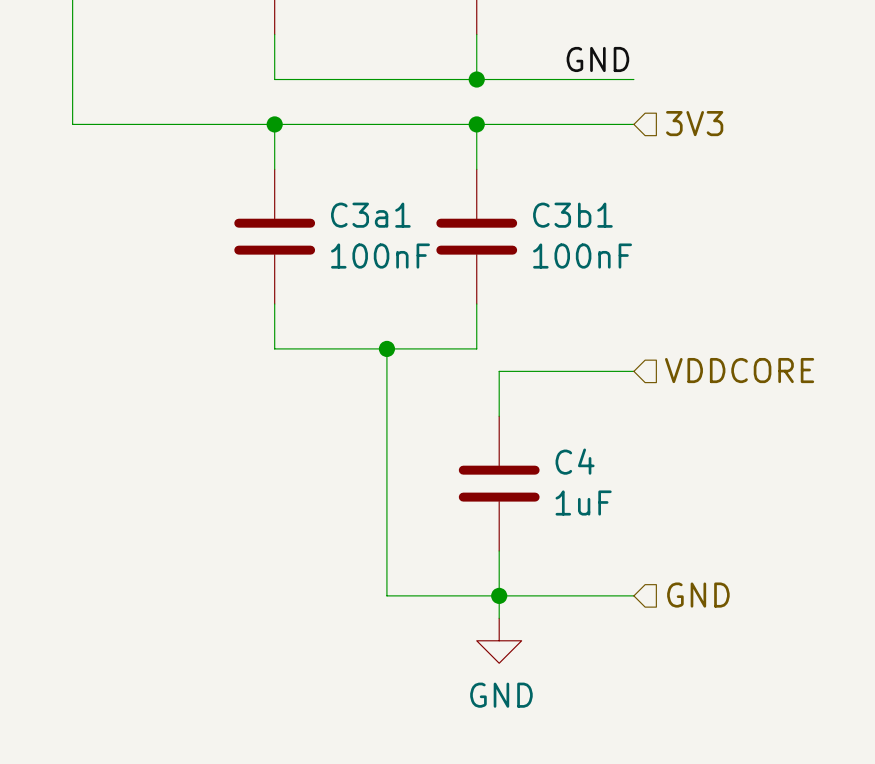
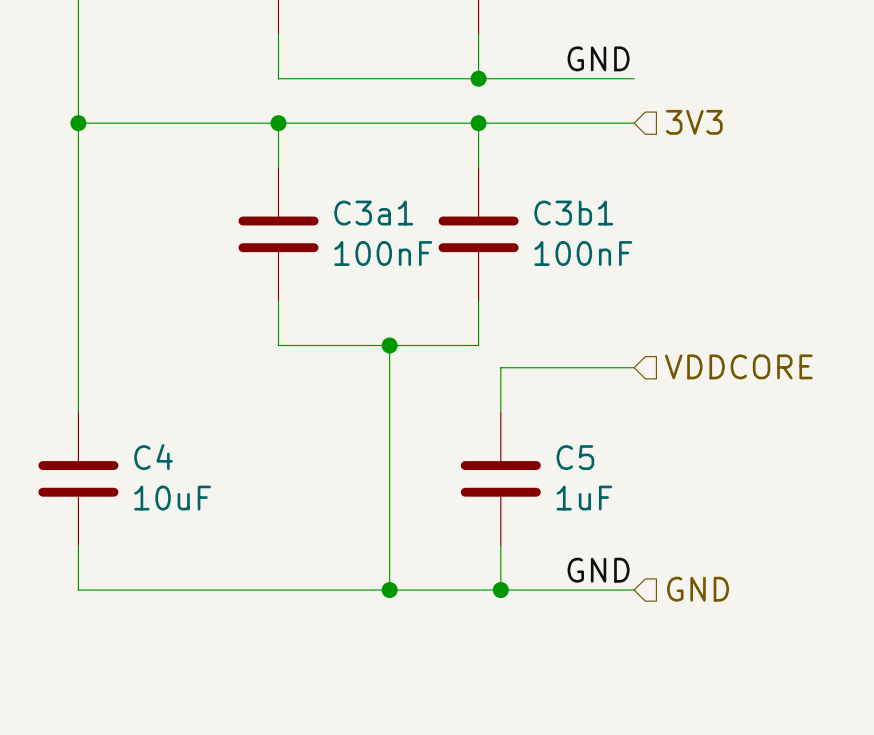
wire: none -> (78, 123) (78, 412)
junction: none -> (78, 123)
C4 name: C4 (575, 461) -> C5 (575, 457)
C4: none -> 10uF (78, 478)
wire: none -> (78, 545) (78, 590) (389, 590)
label: none -> GND (598, 570)
junction: none -> (389, 590)
wire: (499, 595) (499, 618) -> none
power symbol: GND (499, 640) -> none

